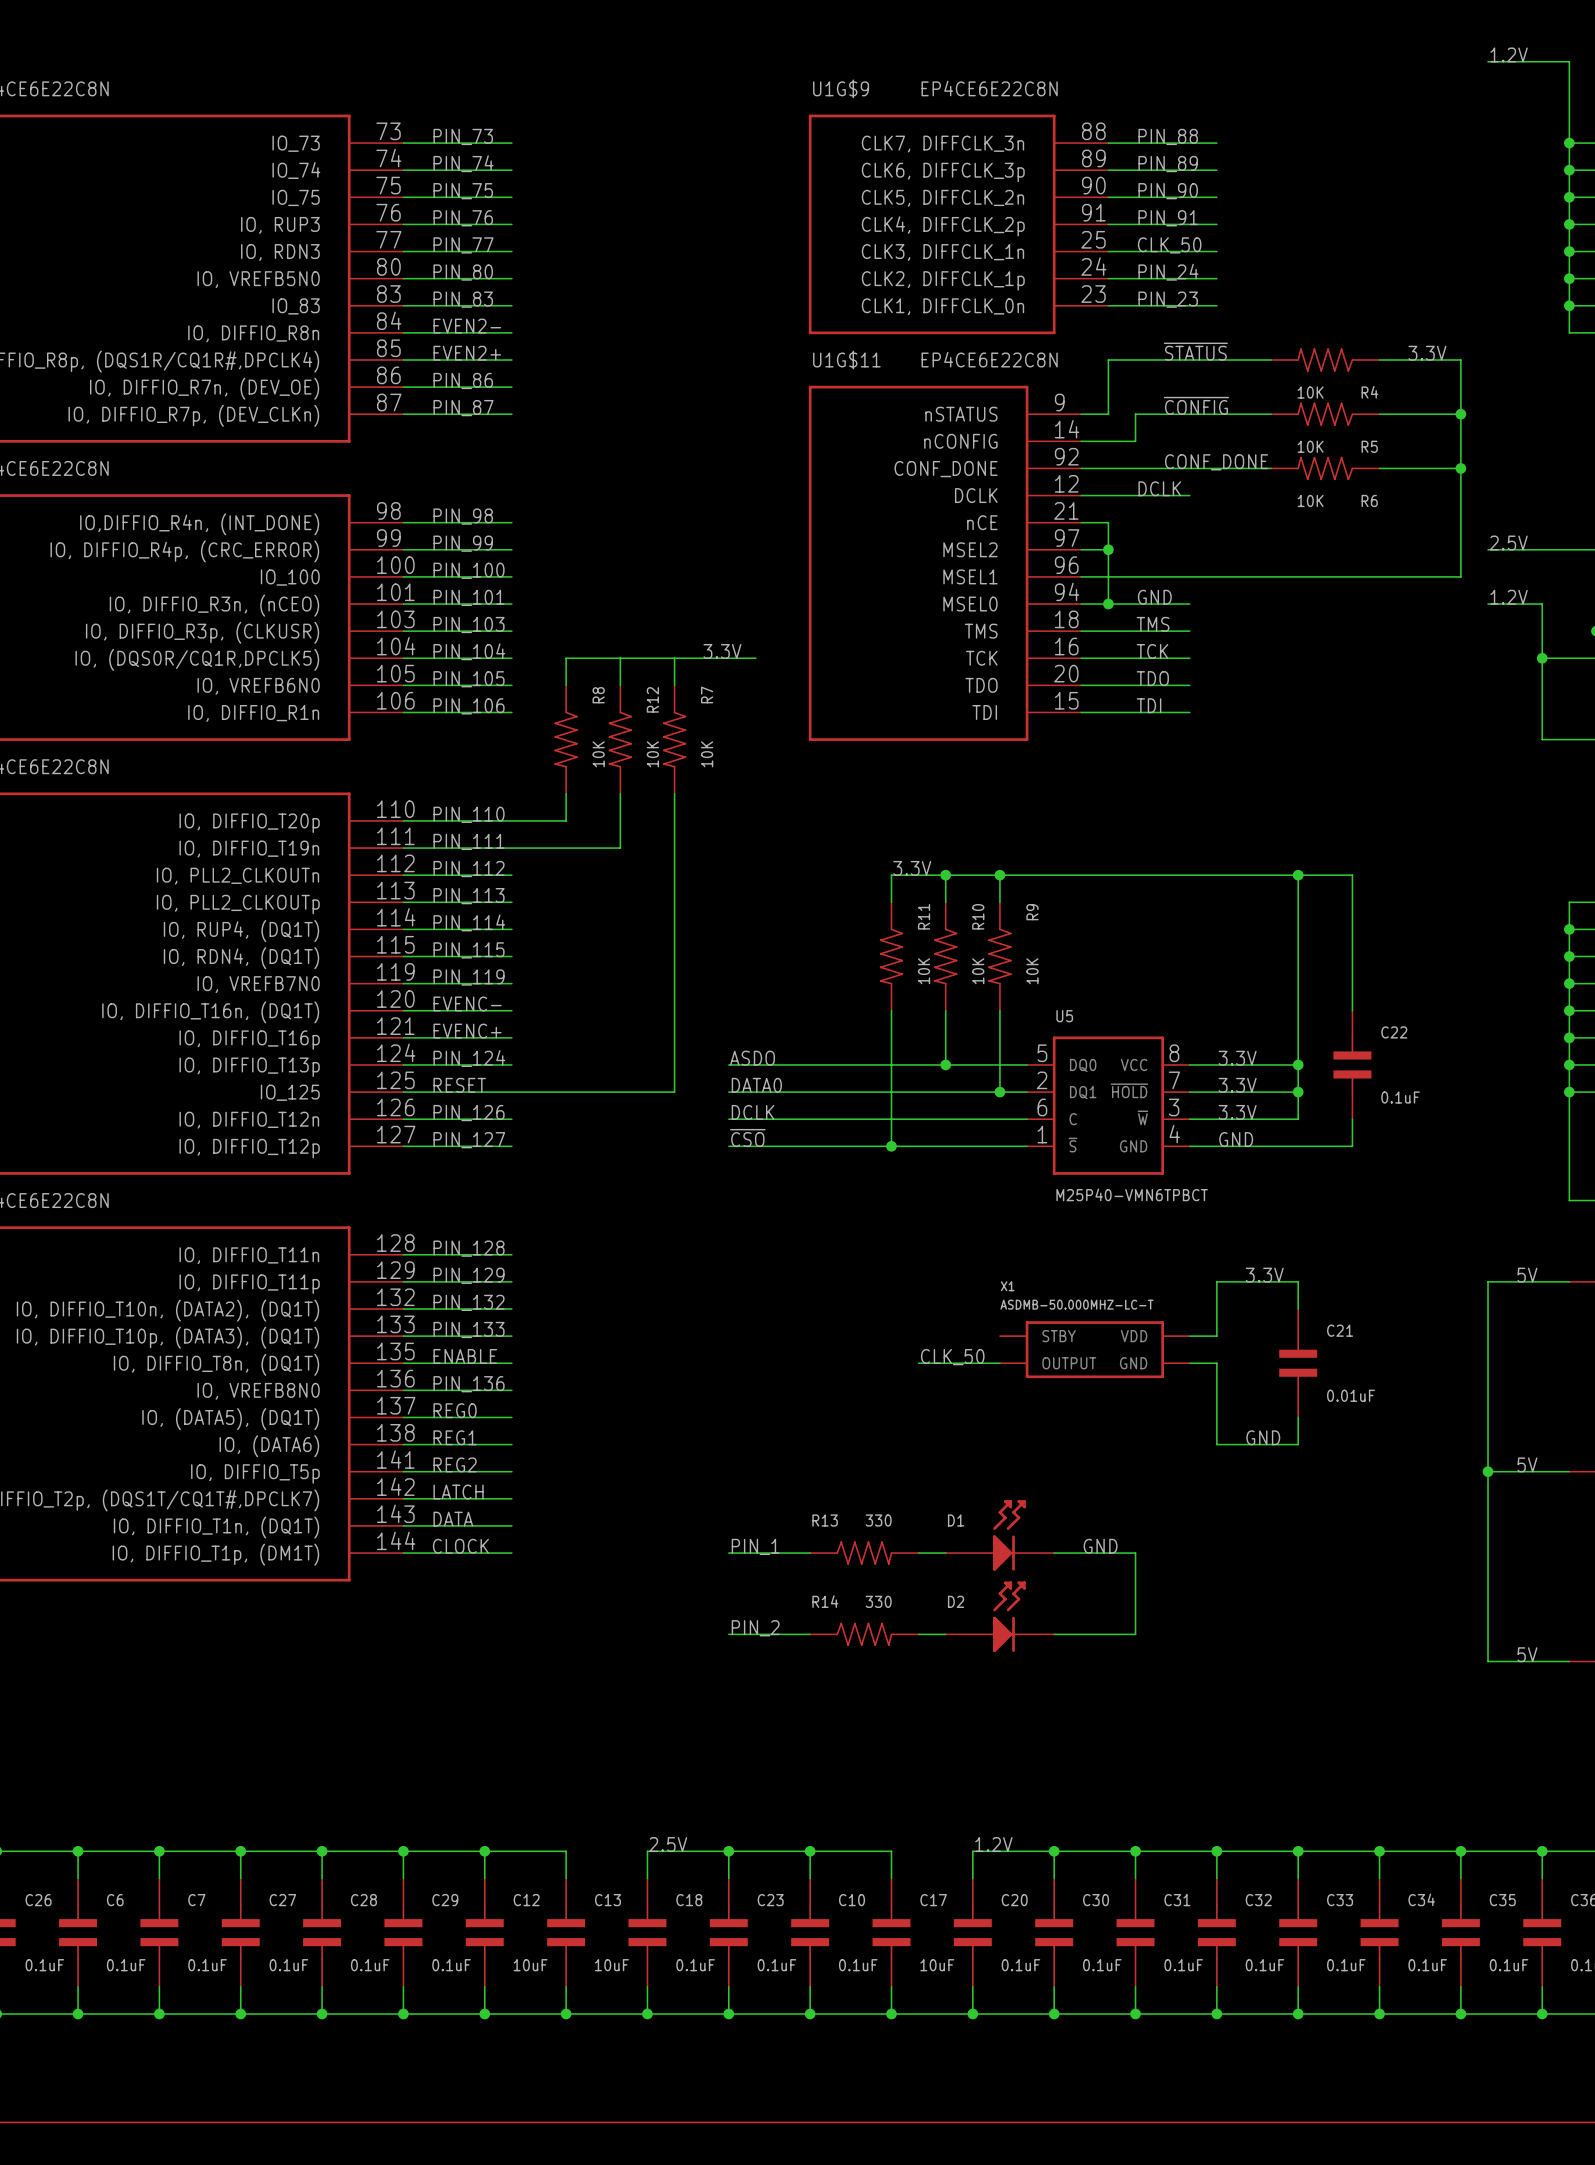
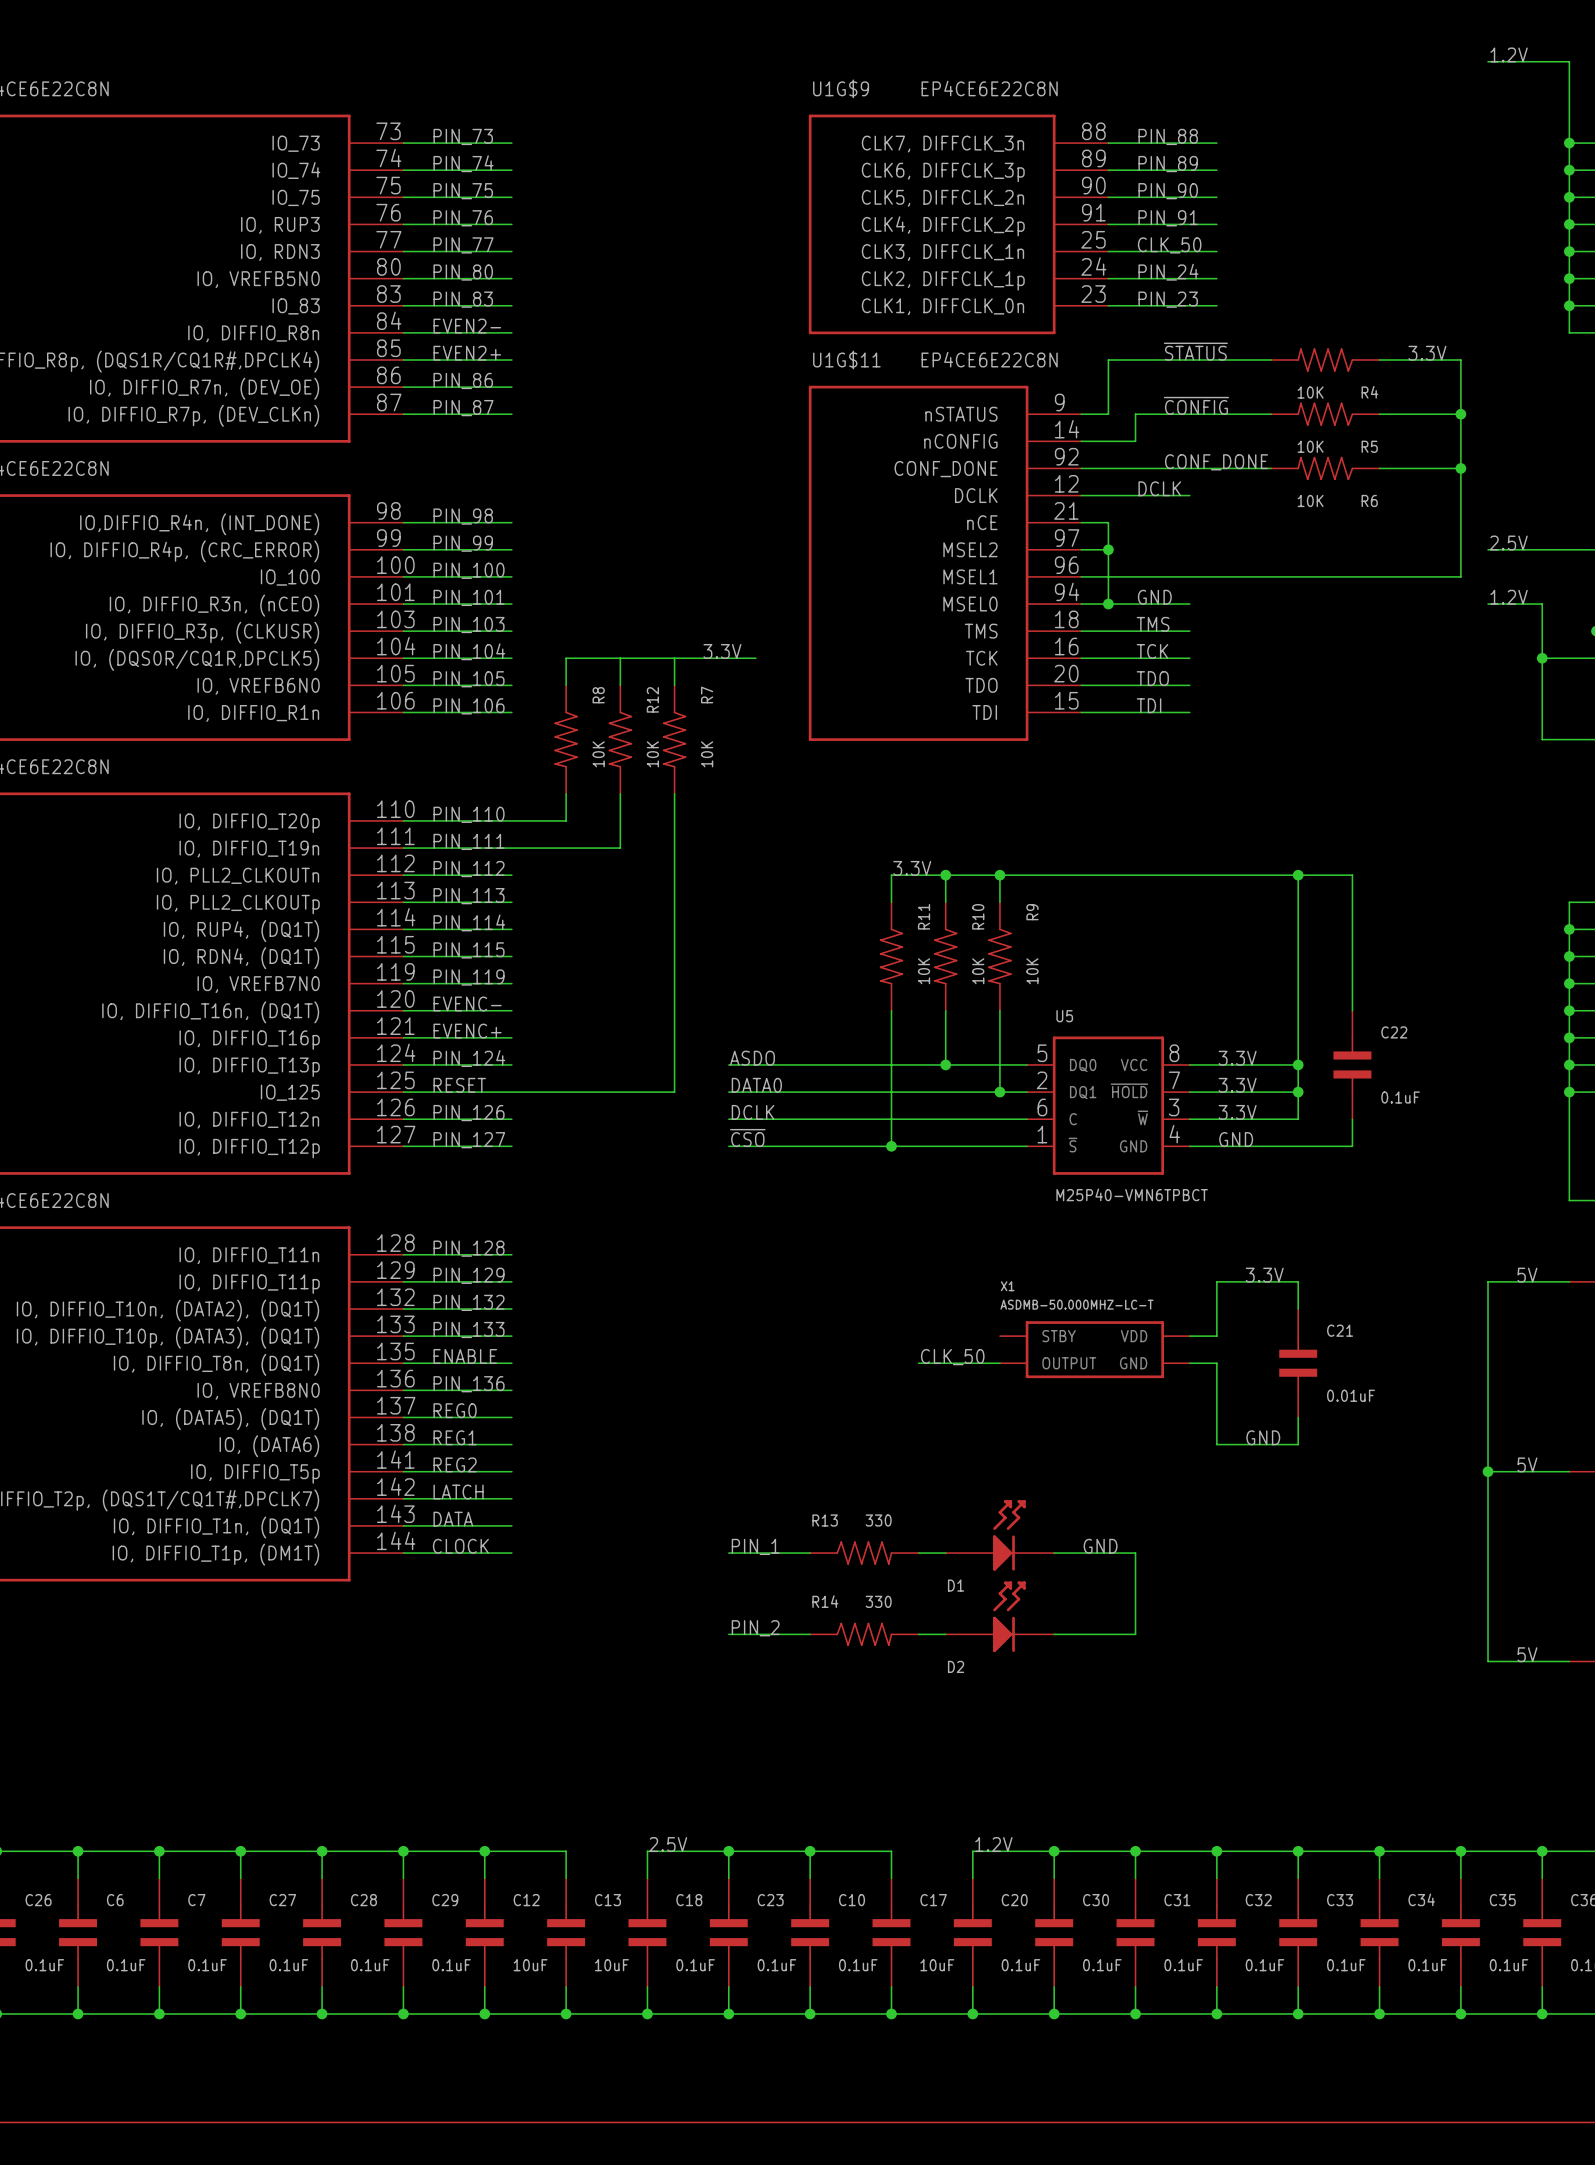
D1 name position: D1 (956, 1520) -> D1 (956, 1585)
D2 name position: D2 (956, 1601) -> D2 (956, 1666)

